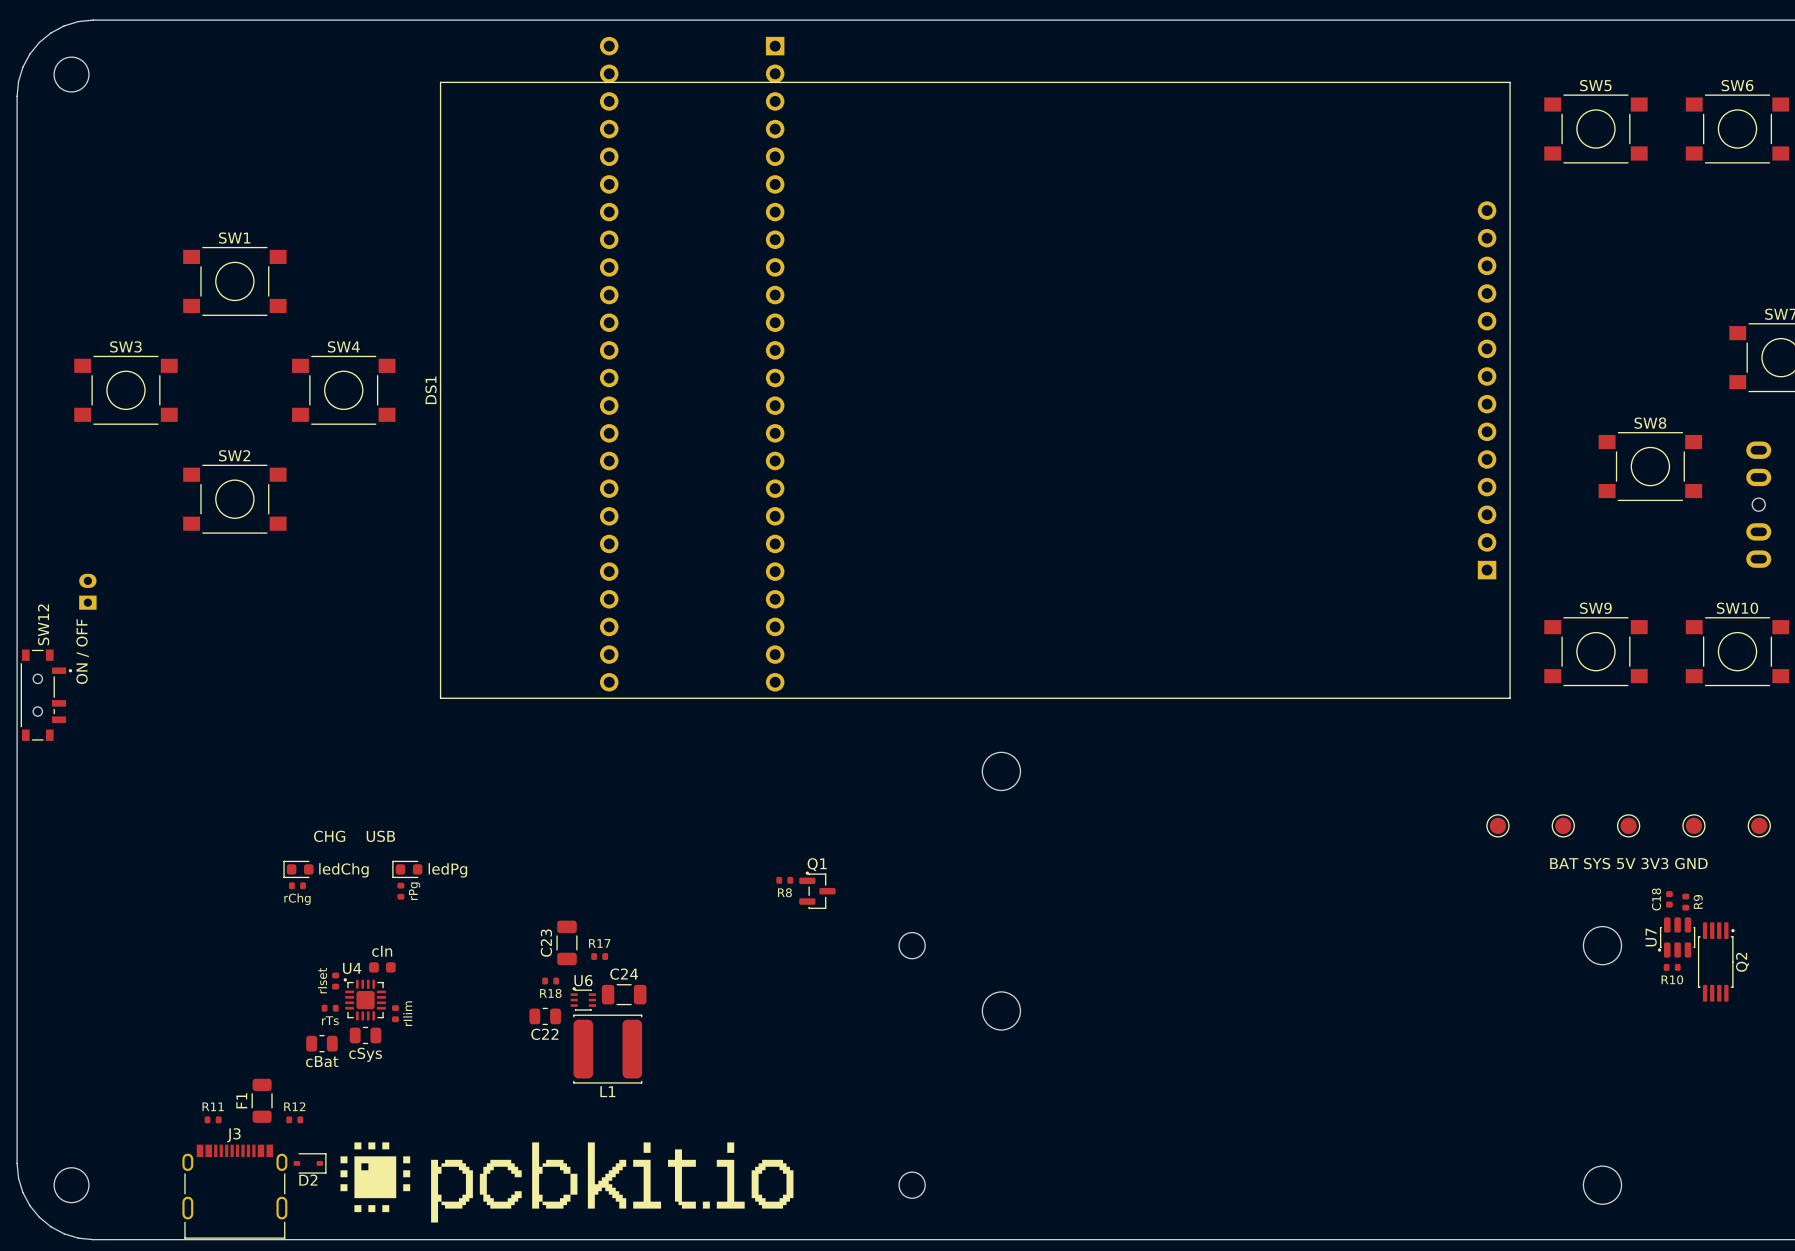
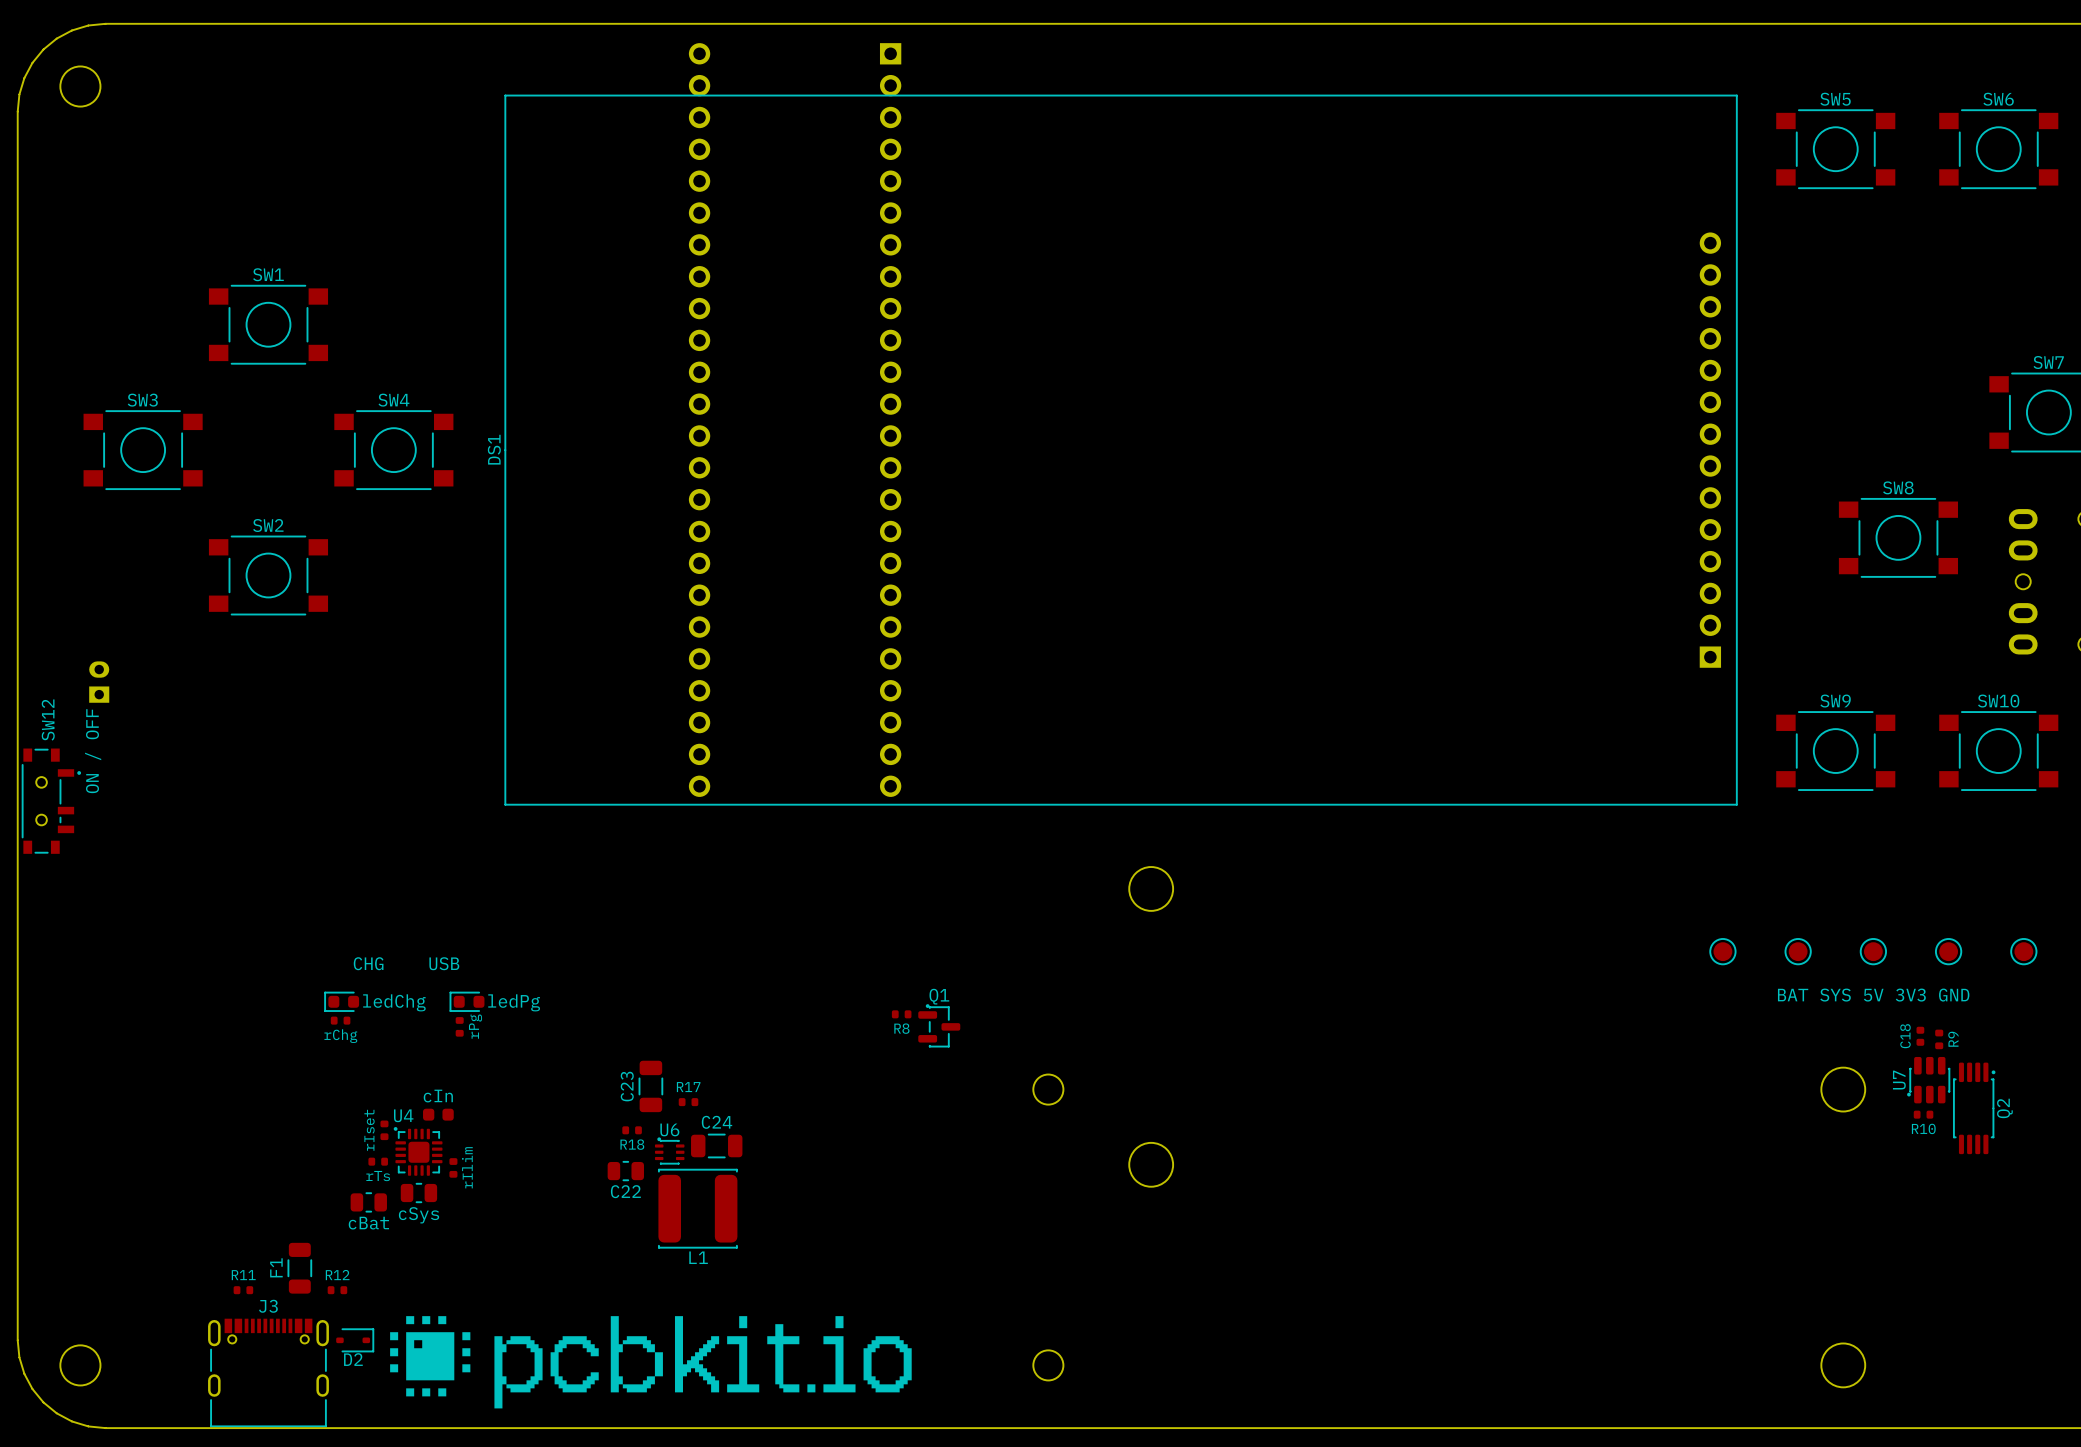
J3 footprint: [182, 1144, 288, 1239] -> [208, 1318, 329, 1428]

